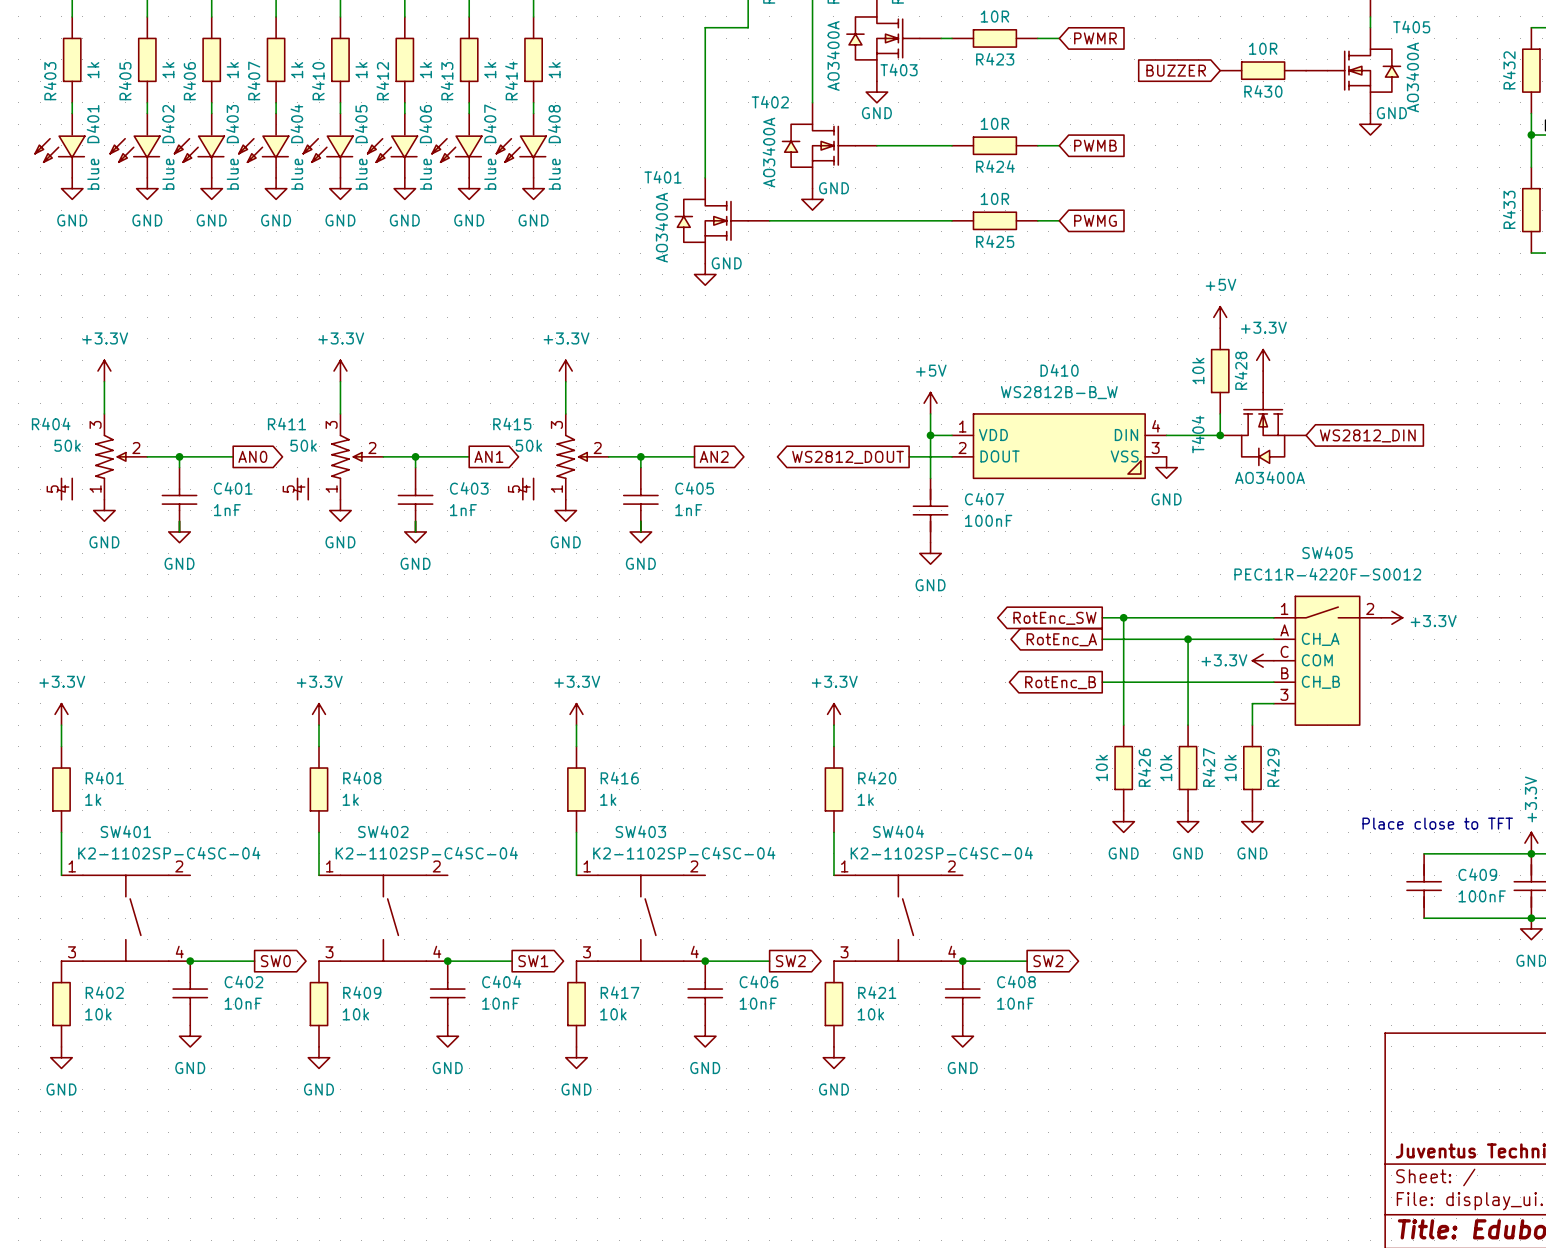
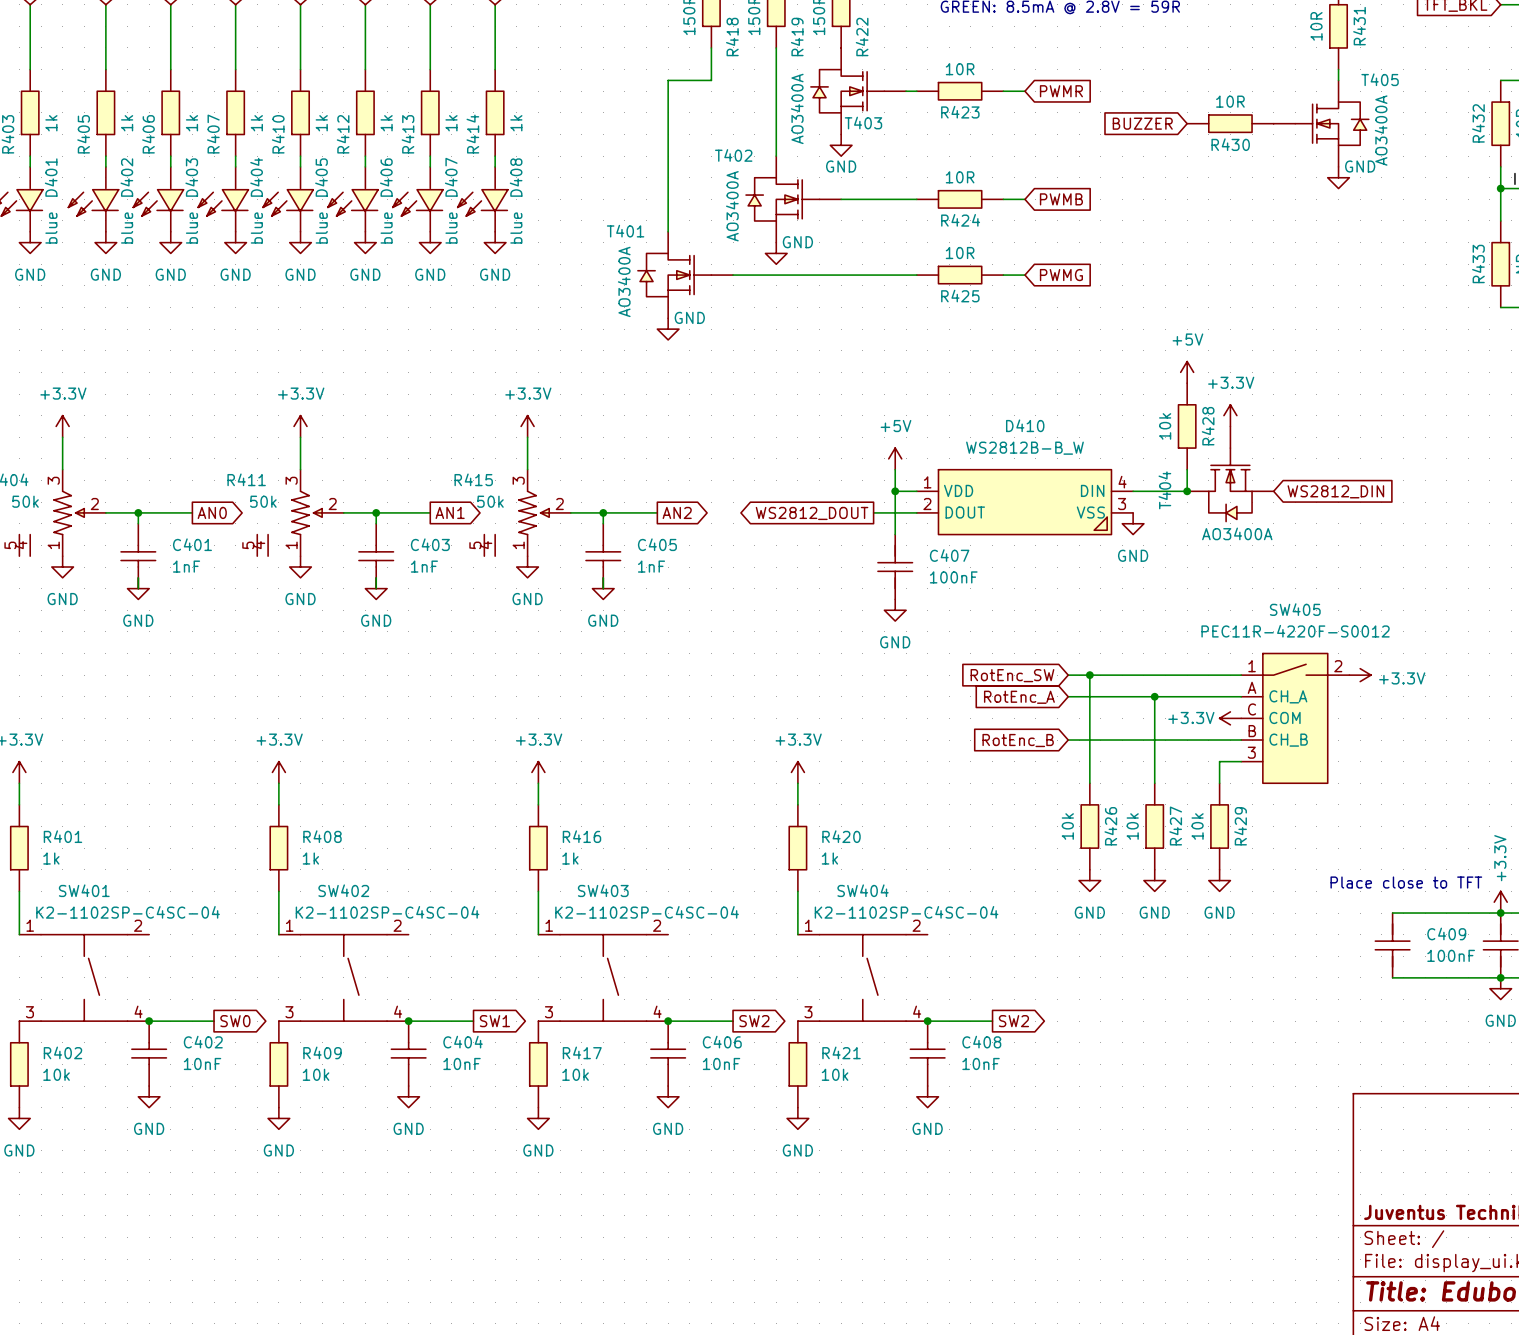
global label shape: output (1054, 618) -> input (1012, 675)
global label shape: output (1061, 639) -> input (1019, 697)
global label shape: output (1060, 682) -> input (1018, 740)

